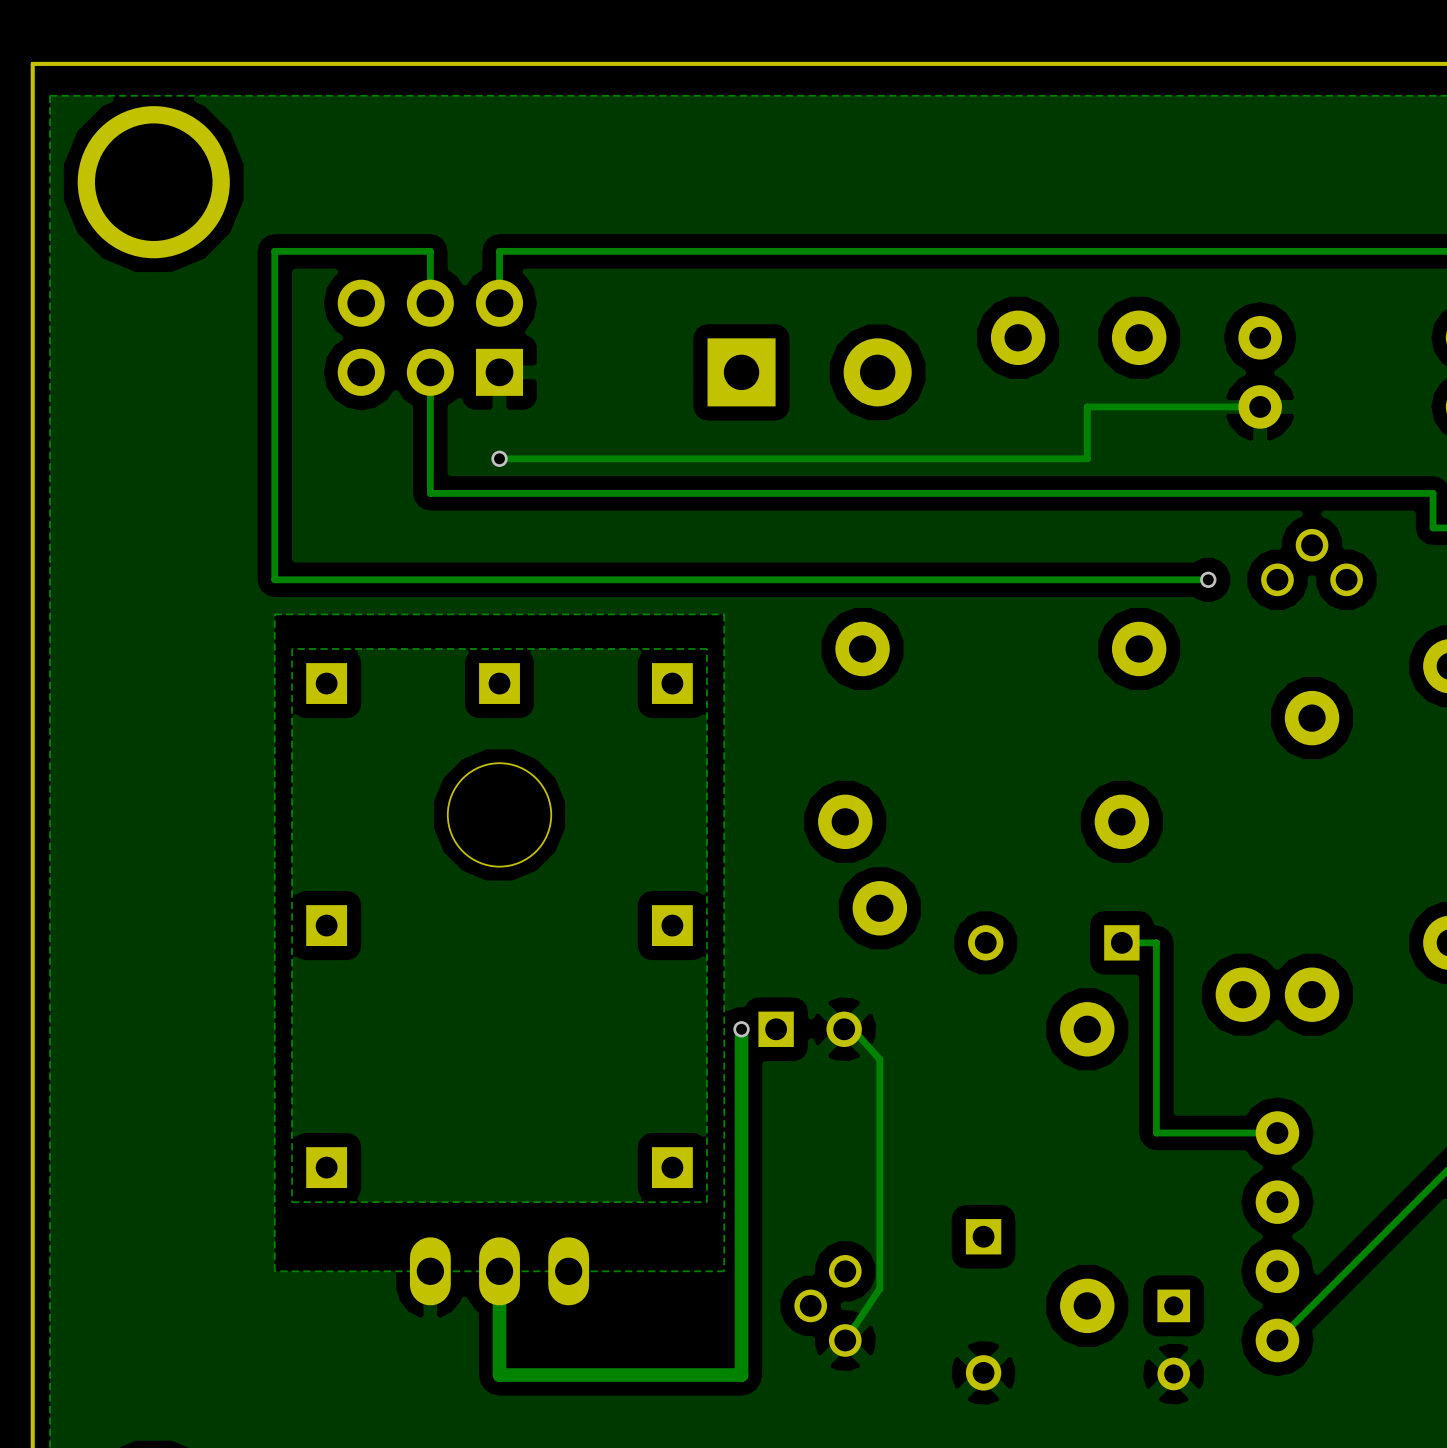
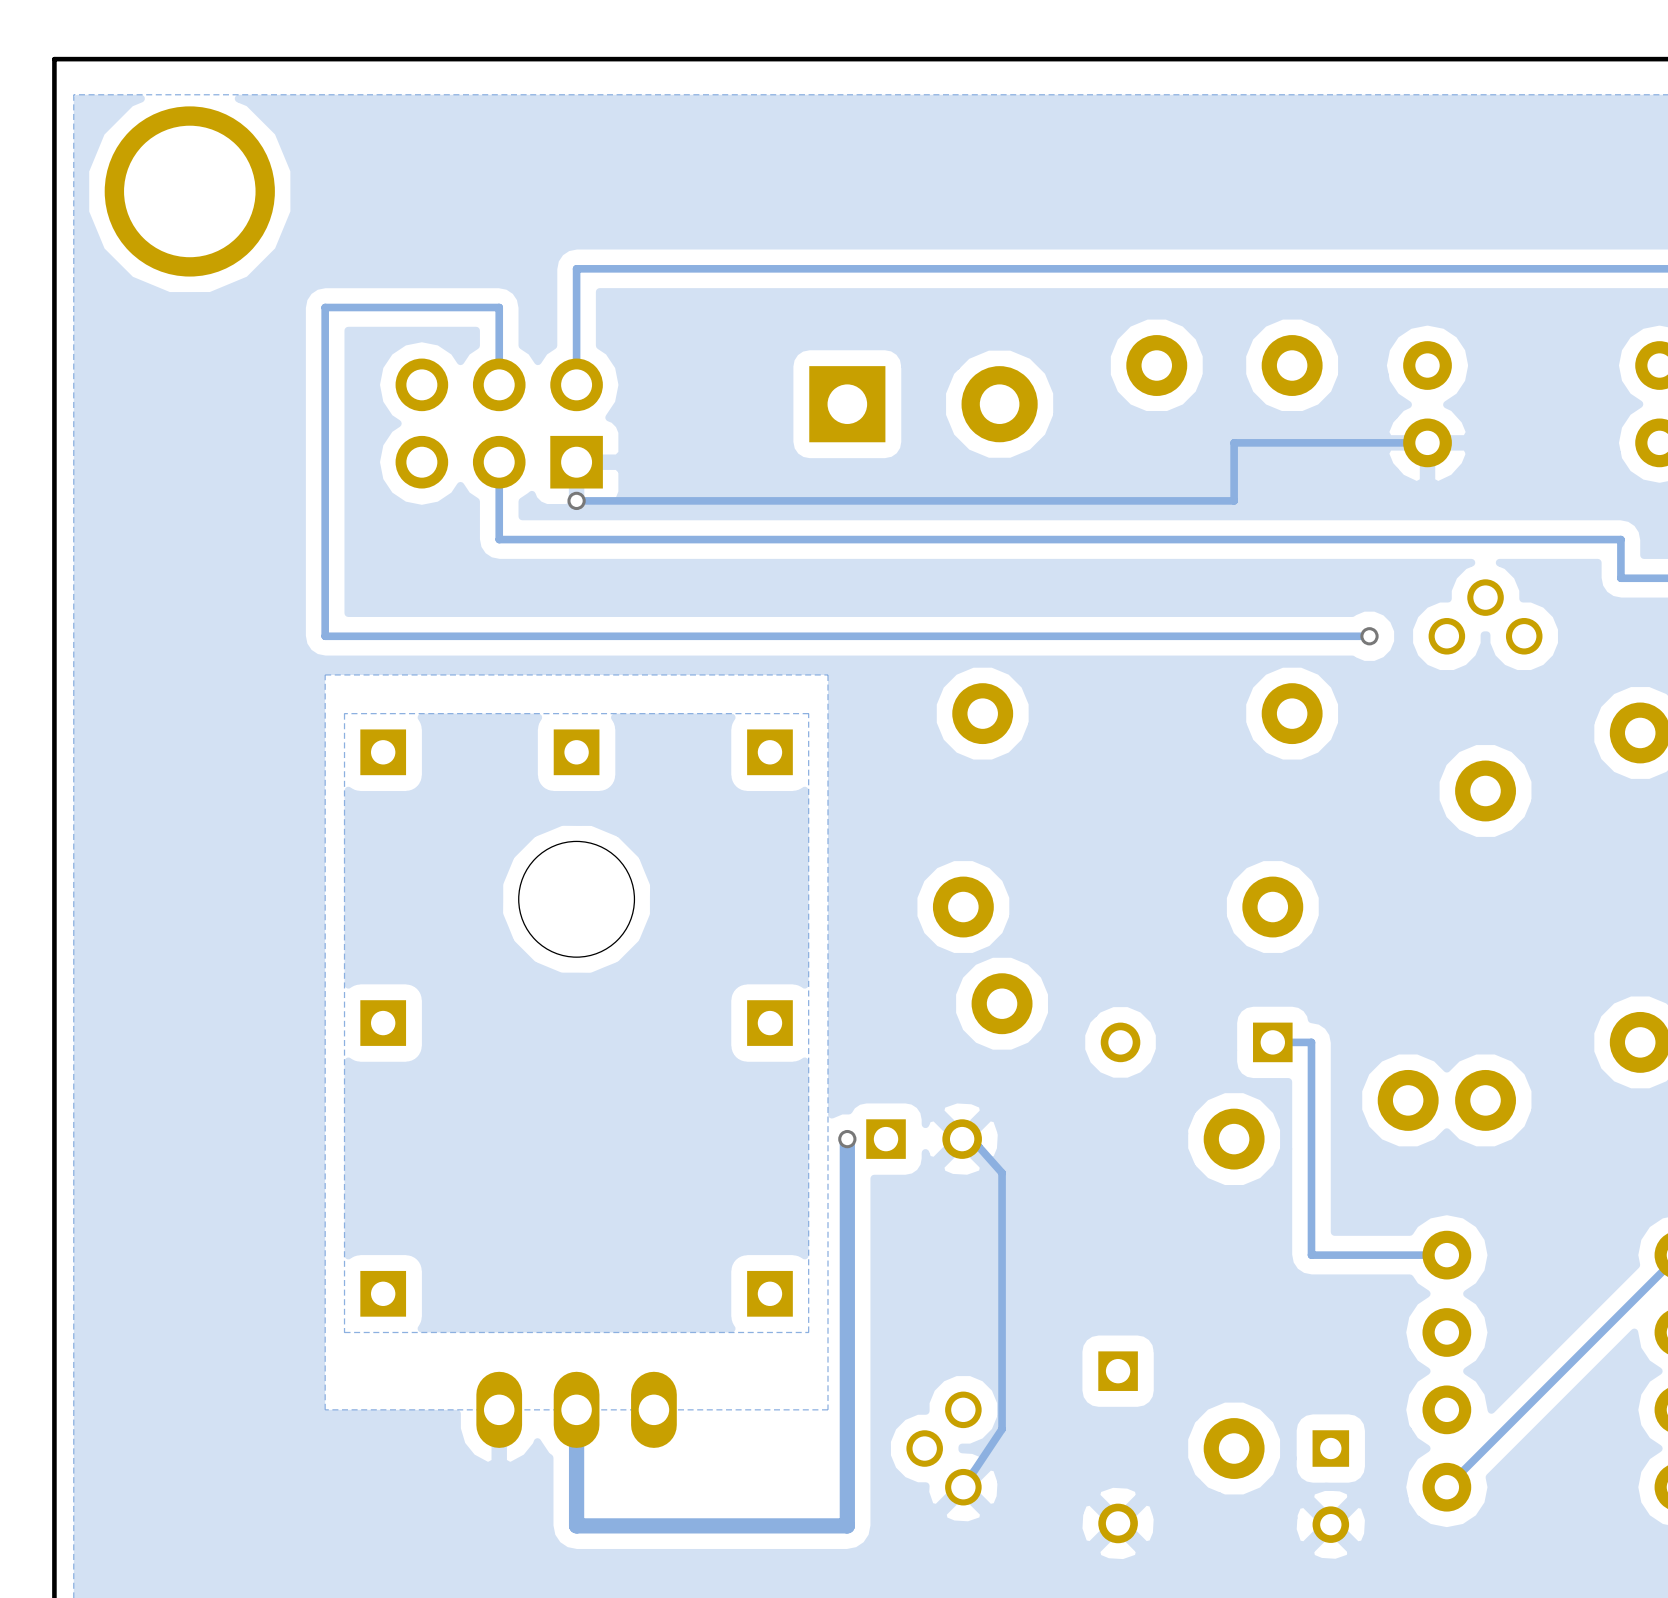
track: (430, 285) (430, 251) (274, 251) (274, 285) -> (499, 307) (325, 307)
track: none -> (576, 326) (576, 384)
part position: (430, 337) -> (499, 423)
track: (430, 372) (430, 424) -> (499, 326) (499, 384)

